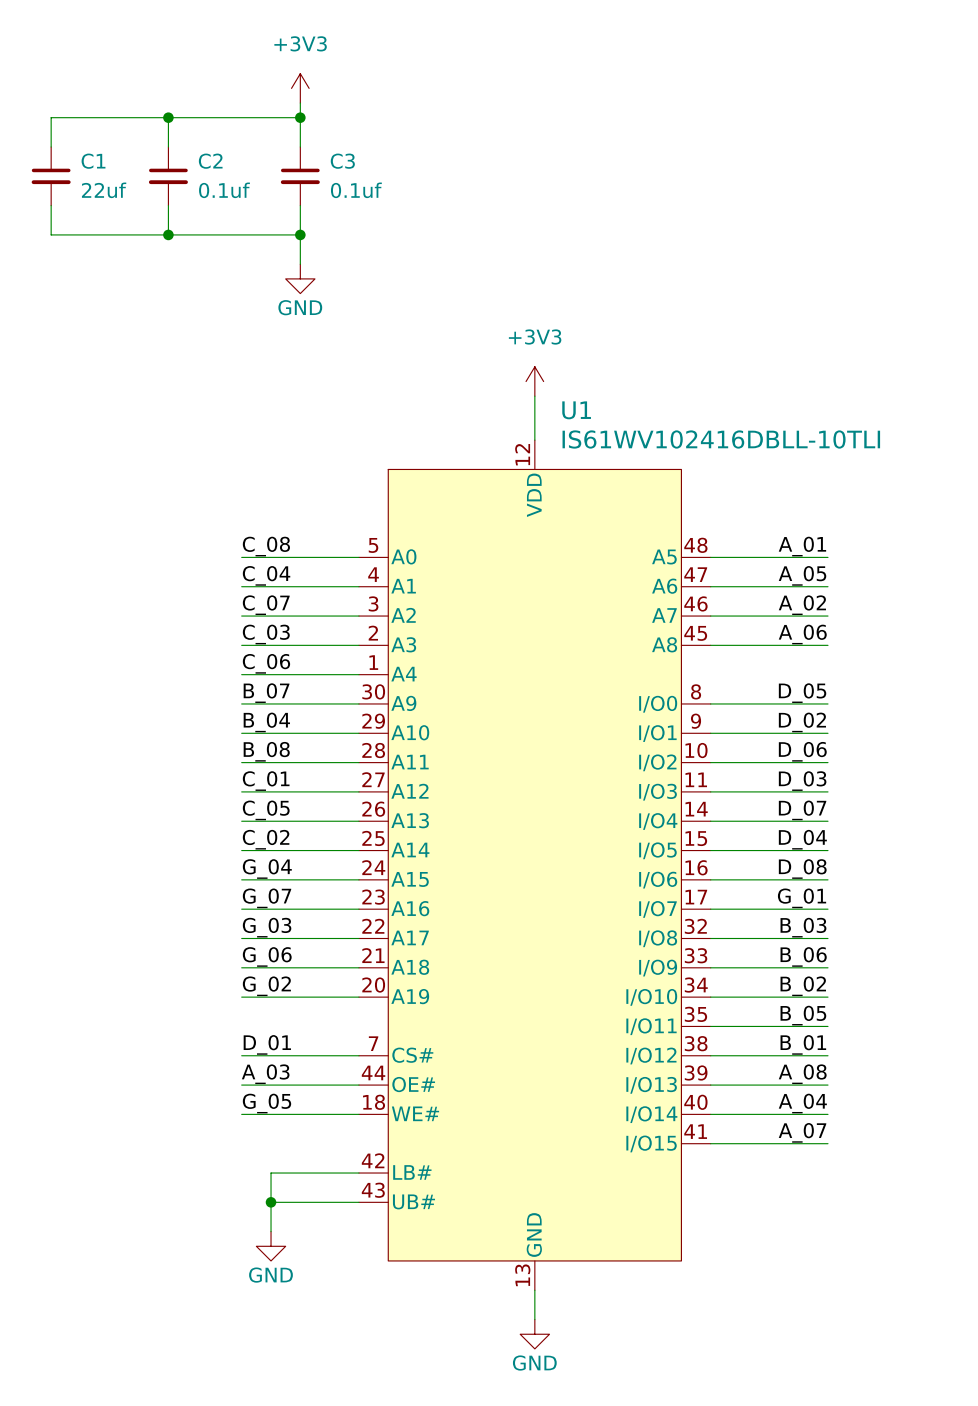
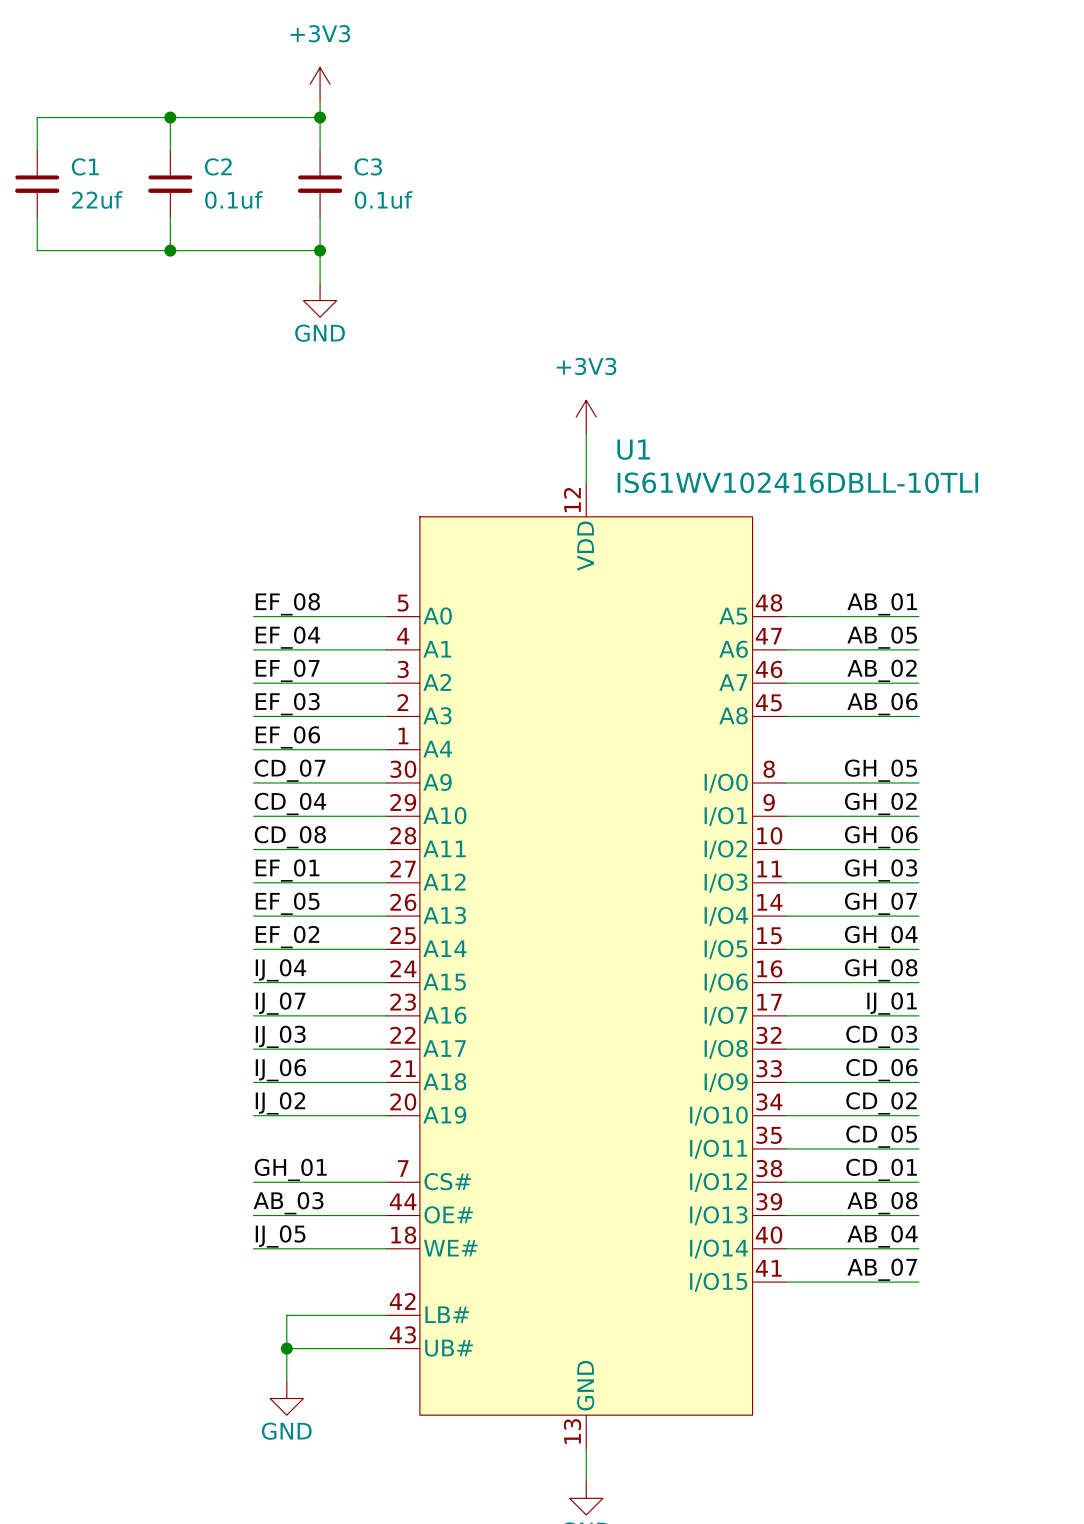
label: C_08 (266, 546) -> EF_08 (287, 604)
label: A_01 (802, 546) -> AB_01 (882, 604)
label: C_04 (266, 575) -> EF_04 (287, 637)
label: A_05 (802, 575) -> AB_05 (882, 637)
label: C_07 (266, 605) -> EF_07 (287, 670)
label: A_02 (802, 605) -> AB_02 (882, 670)
label: C_03 (266, 634) -> EF_03 (287, 704)
label: A_06 (802, 634) -> AB_06 (882, 704)
label: C_06 (266, 663) -> EF_06 (287, 737)
label: B_07 (266, 693) -> CD_07 (290, 770)
label: D_05 (802, 693) -> GH_05 (880, 770)
label: B_04 (266, 722) -> CD_04 (290, 803)
label: D_02 (802, 722) -> GH_02 (880, 803)
label: B_08 (266, 751) -> CD_08 (290, 837)
label: D_06 (802, 751) -> GH_06 (881, 837)
label: C_01 (266, 781) -> EF_01 (287, 870)
label: D_03 (802, 781) -> GH_03 (881, 870)
label: C_05 (266, 810) -> EF_05 (287, 903)
label: D_07 (802, 810) -> GH_07 (880, 903)
label: C_02 (266, 839) -> EF_02 (287, 937)
label: D_04 (802, 839) -> GH_04 (881, 937)
label: G_04 (267, 869) -> IJ_04 (280, 970)
label: D_08 (802, 869) -> GH_08 (881, 970)
label: G_07 (267, 898) -> IJ_07 (280, 1003)
label: G_01 (802, 898) -> IJ_01 (892, 1003)
label: G_03 (267, 927) -> IJ_03 (280, 1036)
label: B_03 (803, 927) -> CD_03 (881, 1036)
label: G_06 (267, 956) -> IJ_06 (280, 1070)
label: B_06 (803, 956) -> CD_06 (881, 1070)
label: G_02 (266, 986) -> IJ_02 (280, 1103)
label: B_02 (803, 986) -> CD_02 (881, 1103)
label: B_05 (803, 1015) -> CD_05 (881, 1136)
label: D_01 (267, 1044) -> GH_01 (290, 1169)
label: B_01 (803, 1044) -> CD_01 (881, 1169)
label: A_03 (265, 1074) -> AB_03 (288, 1203)
label: A_08 (802, 1074) -> AB_08 (882, 1203)
label: G_05 (266, 1103) -> IJ_05 (280, 1236)
label: A_04 (802, 1103) -> AB_04 (882, 1236)
label: A_07 (802, 1132) -> AB_07 (882, 1269)

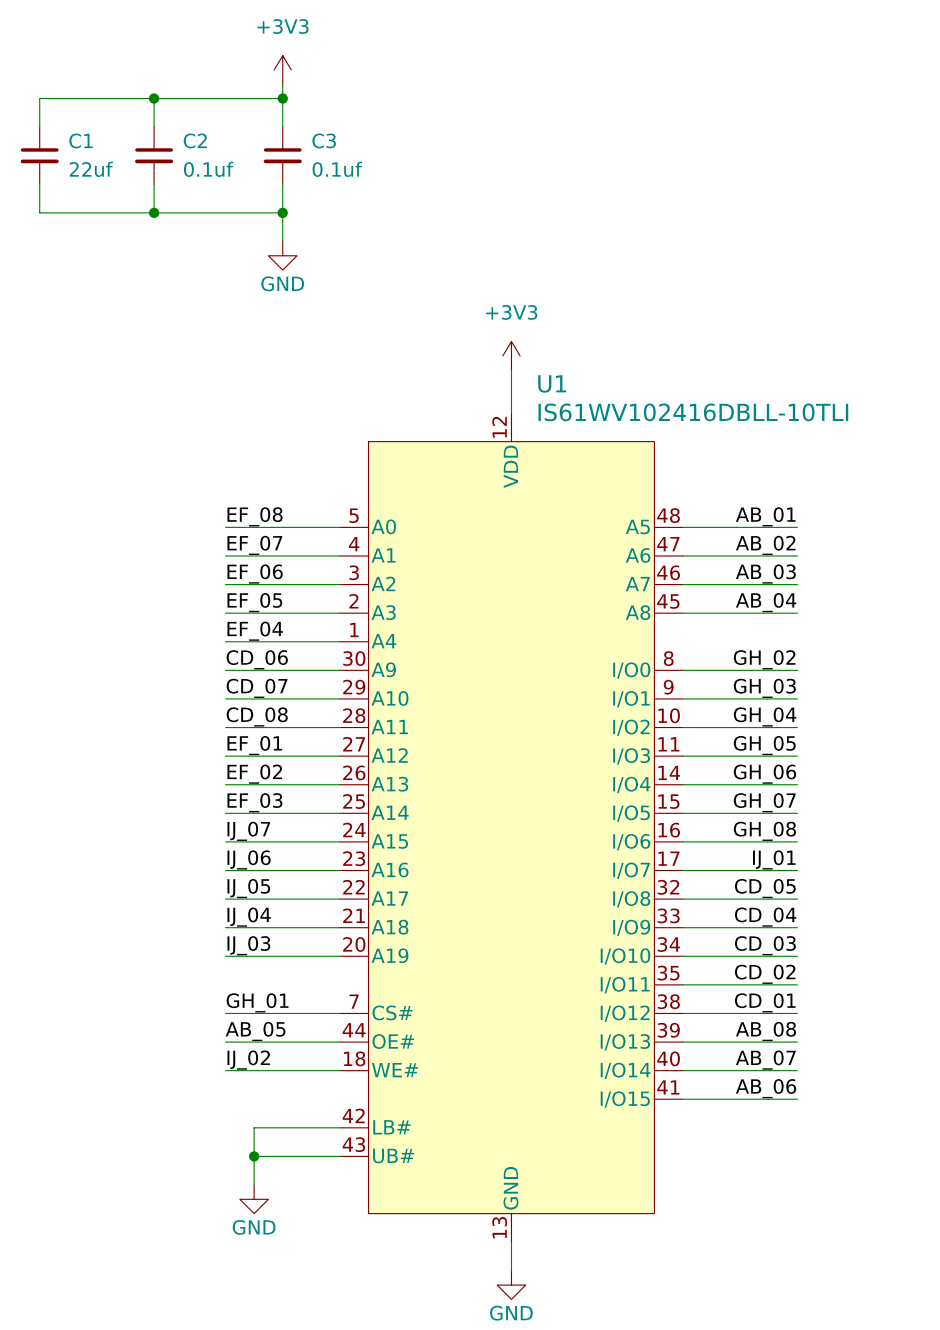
label: EF_04 (287, 637) -> EF_07 (254, 545)
label: AB_05 (882, 637) -> AB_02 (765, 545)
label: EF_07 (287, 670) -> EF_06 (255, 574)
label: AB_02 (882, 670) -> AB_03 (765, 574)
label: EF_03 (287, 704) -> EF_05 (254, 602)
label: AB_06 (882, 704) -> AB_04 (766, 602)
label: EF_06 (287, 737) -> EF_04 (255, 631)
label: CD_07 (290, 770) -> CD_06 (257, 659)
label: GH_05 (880, 770) -> GH_02 (764, 659)
label: CD_04 (290, 803) -> CD_07 (257, 688)
label: GH_02 (880, 803) -> GH_03 (764, 688)
label: GH_06 (881, 837) -> GH_04 (765, 716)
label: GH_03 (881, 870) -> GH_05 (764, 745)
label: EF_05 (287, 903) -> EF_02 (254, 774)
label: GH_07 (880, 903) -> GH_06 (764, 774)
label: EF_02 (287, 937) -> EF_03 (254, 802)
label: GH_04 (881, 937) -> GH_07 (764, 802)
label: IJ_04 (280, 970) -> IJ_07 (248, 831)
label: IJ_07 (280, 1003) -> IJ_06 (249, 859)
label: IJ_03 (280, 1036) -> IJ_05 (248, 888)
label: CD_03 (881, 1036) -> CD_05 (765, 888)
label: IJ_06 (280, 1070) -> IJ_04 (249, 917)
label: CD_06 (881, 1070) -> CD_04 (765, 917)
label: IJ_02 (280, 1103) -> IJ_03 (248, 945)
label: CD_02 (881, 1103) -> CD_03 (765, 945)
label: CD_05 (881, 1136) -> CD_02 (765, 974)
label: AB_03 (288, 1203) -> AB_05 (255, 1031)
label: IJ_05 (280, 1236) -> IJ_02 (248, 1060)
label: AB_04 (882, 1236) -> AB_07 (765, 1060)
label: AB_07 (882, 1269) -> AB_06 (766, 1088)

